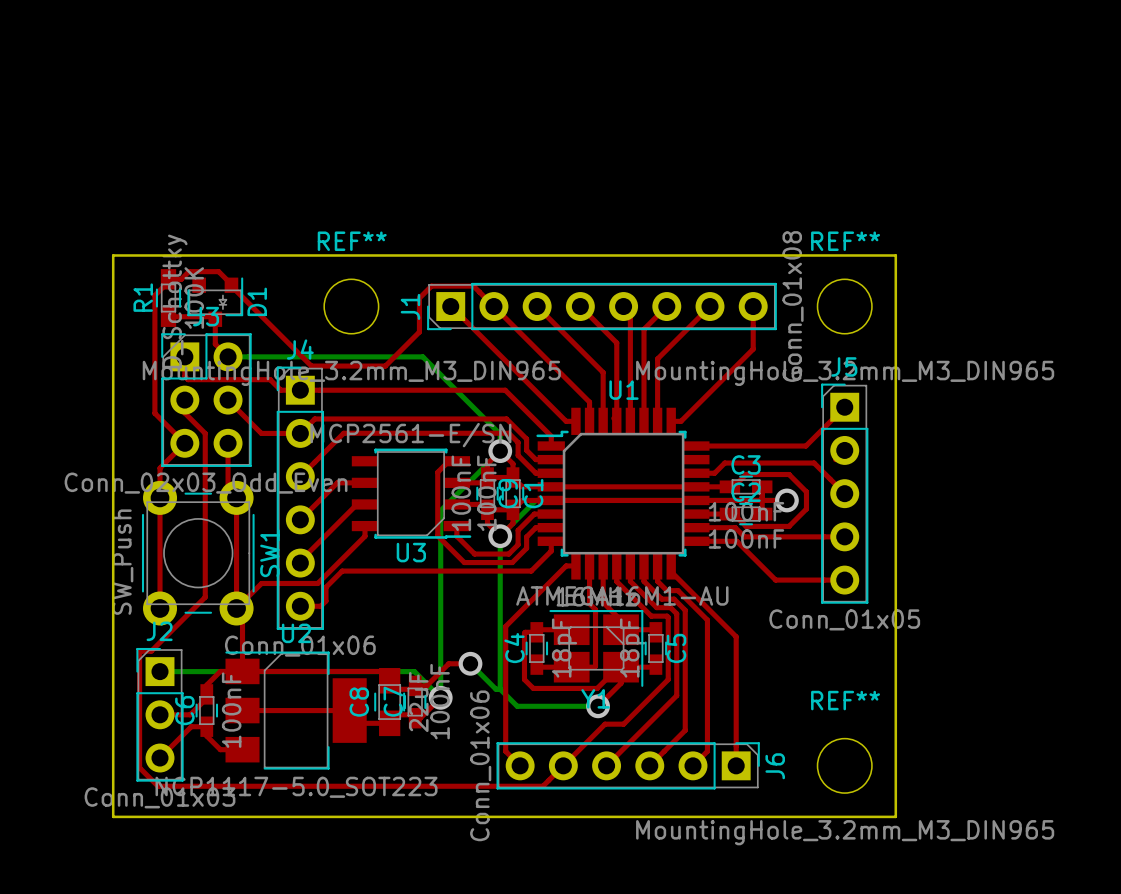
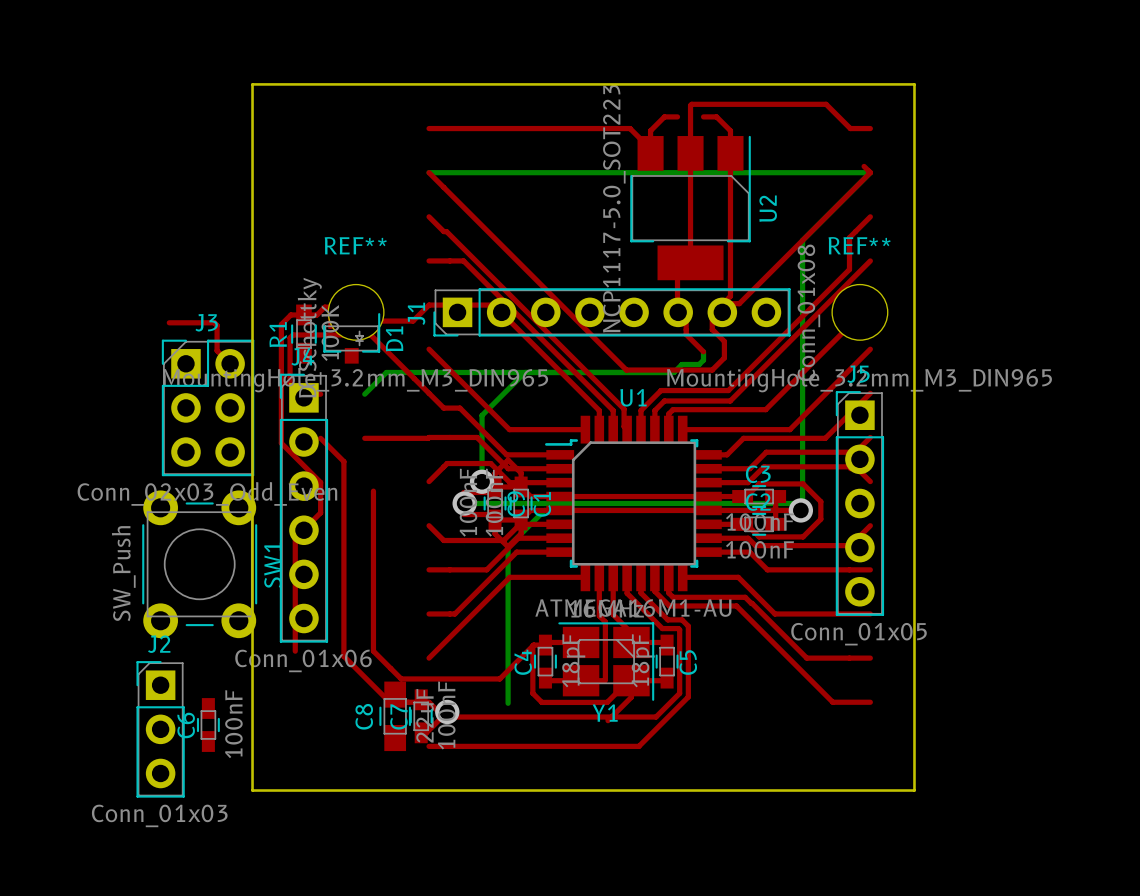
top track: none -> (677, 116) (664, 116) (650, 130) (650, 153)
top track: none -> (703, 116) (716, 116) (730, 130) (730, 296) (723, 303)
top track: none -> (429, 128) (630, 128) (650, 149)
top track: none -> (870, 128) (850, 128) (826, 104) (690, 105) (690, 262) (677, 275) (677, 303) (686, 312) (686, 334) (703, 351)
top track: none -> (864, 166) (870, 172) (739, 303) (720, 303) (712, 312) (712, 329) (724, 341) (724, 357) (712, 370) (626, 370) (429, 172)
bottom track: none -> (429, 172) (870, 172) (802, 240) (802, 510) (795, 503) (464, 503)
top track: none -> (429, 216) (443, 231) (446, 231) (624, 409) (624, 426)
board edge: (113, 255) (113, 816) (895, 816) (895, 255) (113, 255) -> (252, 84) (252, 790) (914, 790) (914, 84) (252, 84)
R1 position: (168, 298) -> (303, 334)
D1 position: (215, 302) -> (351, 338)
top track: (450, 306) (566, 421) -> (429, 349) (509, 429) (575, 429)
top track: (537, 306) (603, 372) (603, 402) -> (429, 260) (463, 260) (613, 410)
top track: (580, 306) (616, 342) (616, 421) -> none
top track: (623, 306) (630, 313) (630, 402) -> (870, 216) (849, 237) (849, 269) (728, 390) (660, 390) (641, 410)
top track: (666, 306) (644, 329) (644, 402) -> (870, 260) (730, 400) (664, 400) (654, 410)
top track: (710, 306) (657, 358) (657, 405) -> (870, 305) (765, 409) (673, 409) (668, 413)
top track: (753, 306) (753, 349) (681, 421) -> (870, 349) (789, 429) (692, 429)
bottom track: none -> (703, 351) (703, 360) (699, 364) (682, 364) (674, 372) (386, 372) (364, 394)
top track: (184, 356) (184, 376) (188, 379) (270, 379) (280, 390) (505, 390) (551, 436) (551, 446) -> (320, 394) (300, 394) (290, 383) (290, 337) (293, 334) (370, 334) (443, 408) (459, 408) (506, 454) (560, 454)
bottom track: (228, 356) (422, 356) (500, 434) (500, 451) (440, 510) (440, 697) (414, 671) (160, 671) -> none
bottom track: none -> (525, 372) (482, 415) (482, 481)
top track: (184, 400) (184, 413) (205, 433) (205, 597) (151, 651) (139, 652) (139, 767) (158, 786) (542, 786) (605, 724) (623, 724) (645, 702) -> (320, 438) (343, 461) (343, 656) (389, 702) (429, 702) (443, 717) (656, 717)
top track: (228, 400) (261, 433) (300, 433) (314, 418) (506, 418) (526, 439) (526, 450) (535, 459) -> (364, 438) (477, 437) (508, 468) (544, 468)
top track: (589, 402) (473, 286) (431, 286) (419, 298) (419, 332) (385, 366) (311, 366) (218, 271) (188, 271) (181, 279) (168, 279) (168, 281) (154, 295) (154, 413) (184, 443) (160, 468) (160, 608) -> (599, 410) (493, 305) (429, 305) (413, 321) (368, 321) (355, 307) (324, 307) (316, 314) (290, 314) (281, 324) (281, 443) (320, 482) (320, 512) (295, 538) (295, 651)
top track: (844, 407) (805, 446) (714, 446) -> (870, 393) (825, 438) (743, 438) (727, 454)
top track: none -> (870, 437) (855, 452) (766, 452) (749, 468) (707, 468)
top track: (228, 443) (228, 489) (236, 497) (236, 608) -> none
via: (500, 451) -> none
top track: (456, 461) (448, 461) (437, 472) (437, 535) (464, 562) (512, 562) (526, 548) (526, 536) (535, 527) -> (429, 569) (486, 569) (518, 538) (544, 538)
via: none -> (482, 481)
top track: (535, 473) (518, 455) (518, 442) (508, 433) (343, 433) (300, 476) -> (544, 482) (509, 482) (490, 463) (447, 463) (429, 481)
top track: (714, 473) (724, 463) (814, 463) (844, 493) -> (727, 482) (748, 482) (763, 466) (855, 466) (870, 481)
top track: none -> (373, 491) (373, 651) (401, 678) (499, 678) (532, 645)
top track: (365, 482) (337, 482) (300, 519) -> none
U3: MCP2561-E/SN (411, 493) -> none
via: none -> (464, 503)
top track: (365, 504) (356, 504) (300, 563) -> none
top track: (534, 514) (518, 530) (518, 544) (508, 554) (474, 554) (456, 536) (456, 526) -> (542, 524) (519, 524) (503, 540) (443, 540) (429, 525)
top track: (365, 526) (365, 536) (317, 583) (261, 583) (236, 608) -> none
top track: (742, 534) (744, 536) (844, 536) -> (755, 545) (850, 545) (870, 525)
via: (500, 536) -> none
top track: (551, 541) (551, 551) (531, 571) (342, 571) (325, 587) (325, 601) (320, 606) (300, 606) -> (560, 552) (516, 552) (454, 613) (429, 613)
top track: (754, 558) (775, 580) (844, 580) -> (767, 569) (870, 569)
top track: (566, 565) (505, 626) (505, 751) (520, 765) -> (575, 577) (509, 577) (429, 658)
top track: (671, 565) (671, 571) (736, 636) (736, 765) -> (682, 577) (738, 577) (774, 613) (870, 613)
top track: (644, 579) (661, 599) (674, 599) (685, 610) (685, 730) (649, 765) -> (654, 591) (669, 605) (736, 605) (832, 702) (870, 702)
top track: (661, 585) (666, 590) (678, 590) (707, 620) (707, 751) (692, 765) -> (673, 597) (745, 597) (806, 658) (870, 658)
top track: (236, 608) (242, 614) (242, 671) -> none
bottom track: (470, 663) (495, 689) (500, 689) (517, 706) (598, 706) -> none
top track: (470, 663) (448, 663) (426, 685) (415, 685) (417, 679) -> none
via: (470, 663) -> none
top track: (676, 683) (676, 695) (606, 765) -> (688, 696) (638, 746) (429, 746)
top track: (415, 688) (398, 689) (382, 671) (220, 671) (206, 685) (206, 698) (190, 714) (160, 714) -> none
via: (598, 706) -> none
top track: (242, 710) (349, 710) (362, 723) (389, 723) (398, 714) (419, 714) -> none
U2 rotation: 0° (296, 710) -> 90° clockwise (690, 208)
U2 position: (296, 710) -> (690, 208)
top track: (206, 723) (206, 736) (220, 749) (242, 749) -> none
top track: (206, 726) (191, 726) (160, 758) -> none
J6: Conn_01x06 (628, 765) -> none
REF**: MountingHole_3.2mm_M3_DIN965 (844, 765) -> none

